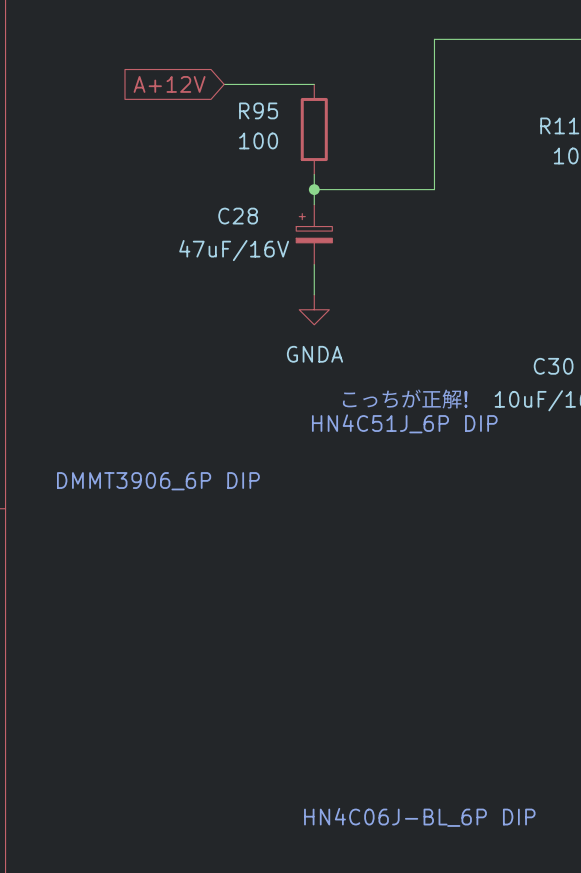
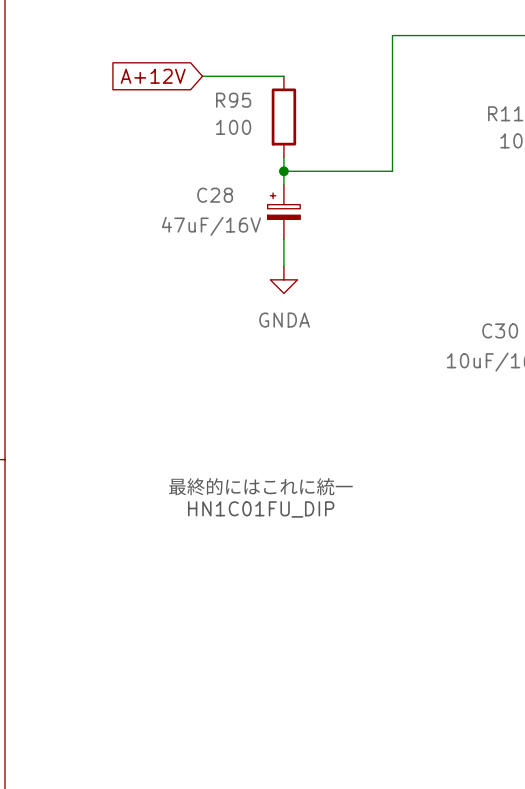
text: こっちが正解! (404, 399) -> none
text: HN4C51J_6P DIP (404, 423) -> none
text: DMMT3906_6P DIP (158, 481) -> none
text: none -> 最終的にはこれに統一 (260, 486)
text: none -> HN1C01FU_DIP (261, 509)
text: HN4C06J-BL_6P DIP (419, 817) -> none

